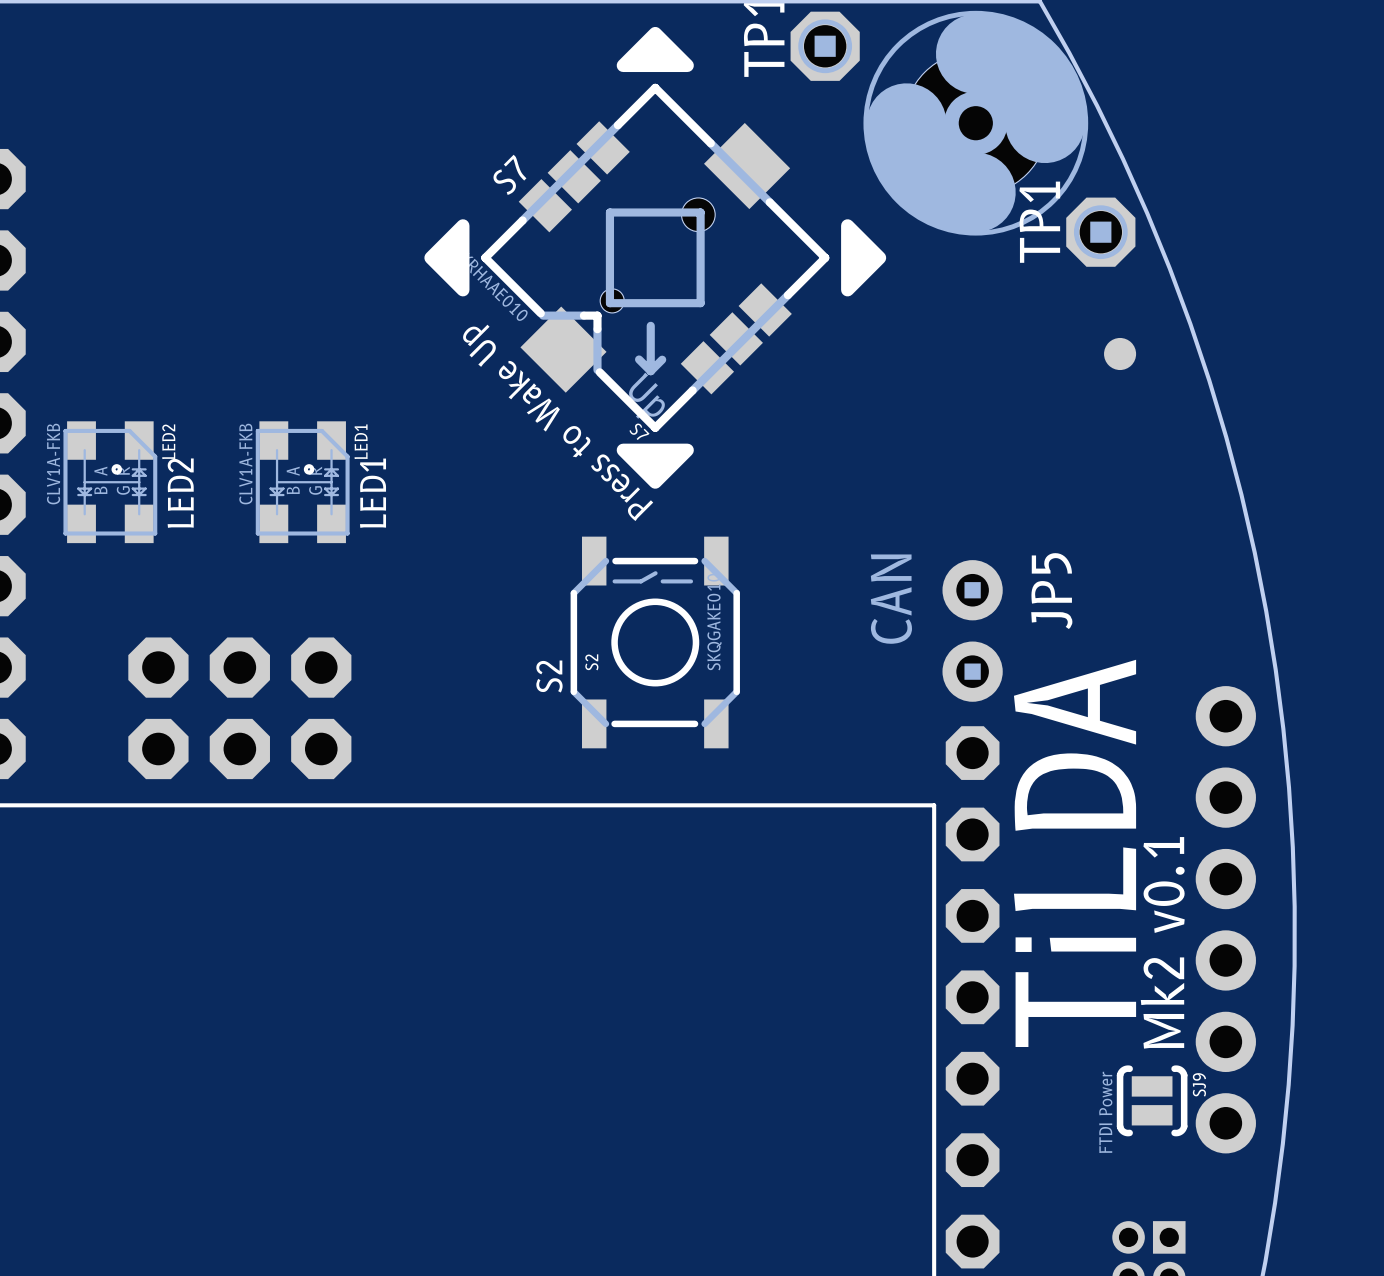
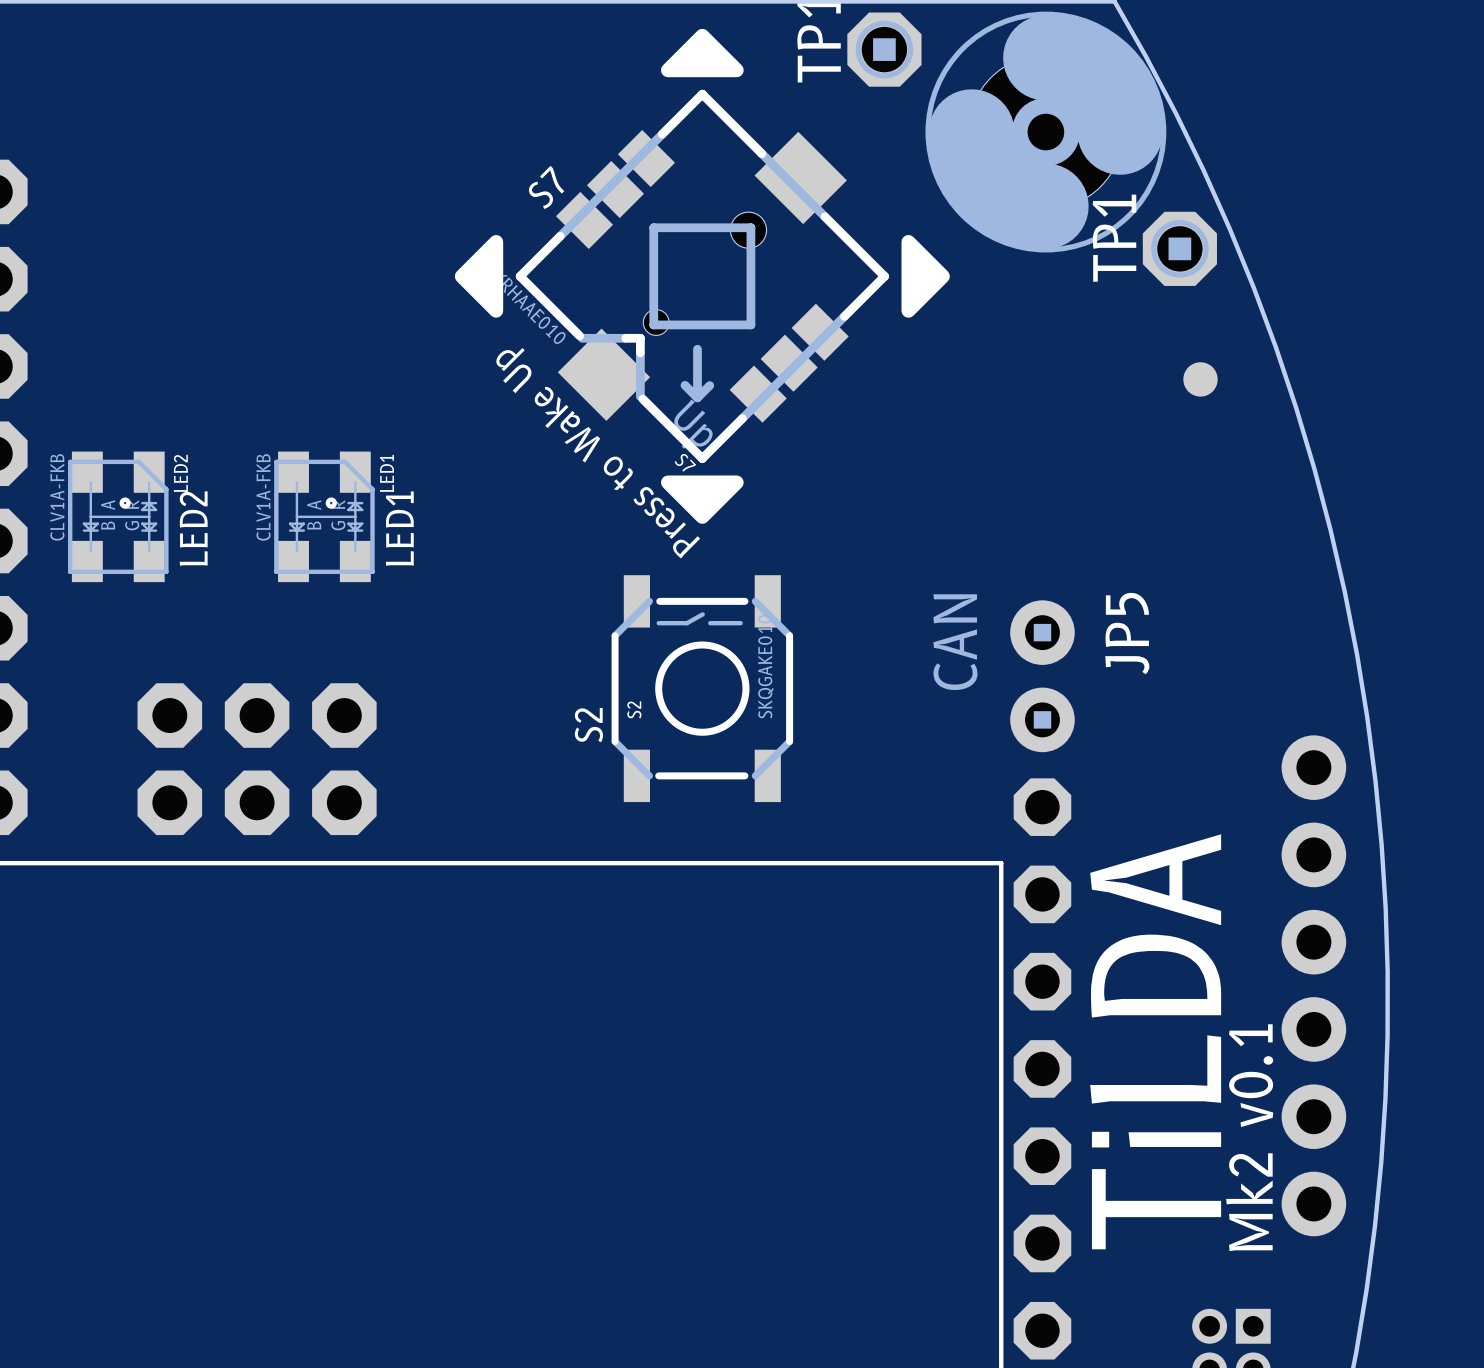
text position: TiLDA (1075, 853) -> TiLDA (1155, 1041)
text position: Mk2 v0.1 (1162, 942) -> Mk2 v0.1 (1249, 1137)
SJ9: FTDI Power (1152, 1100) -> none

